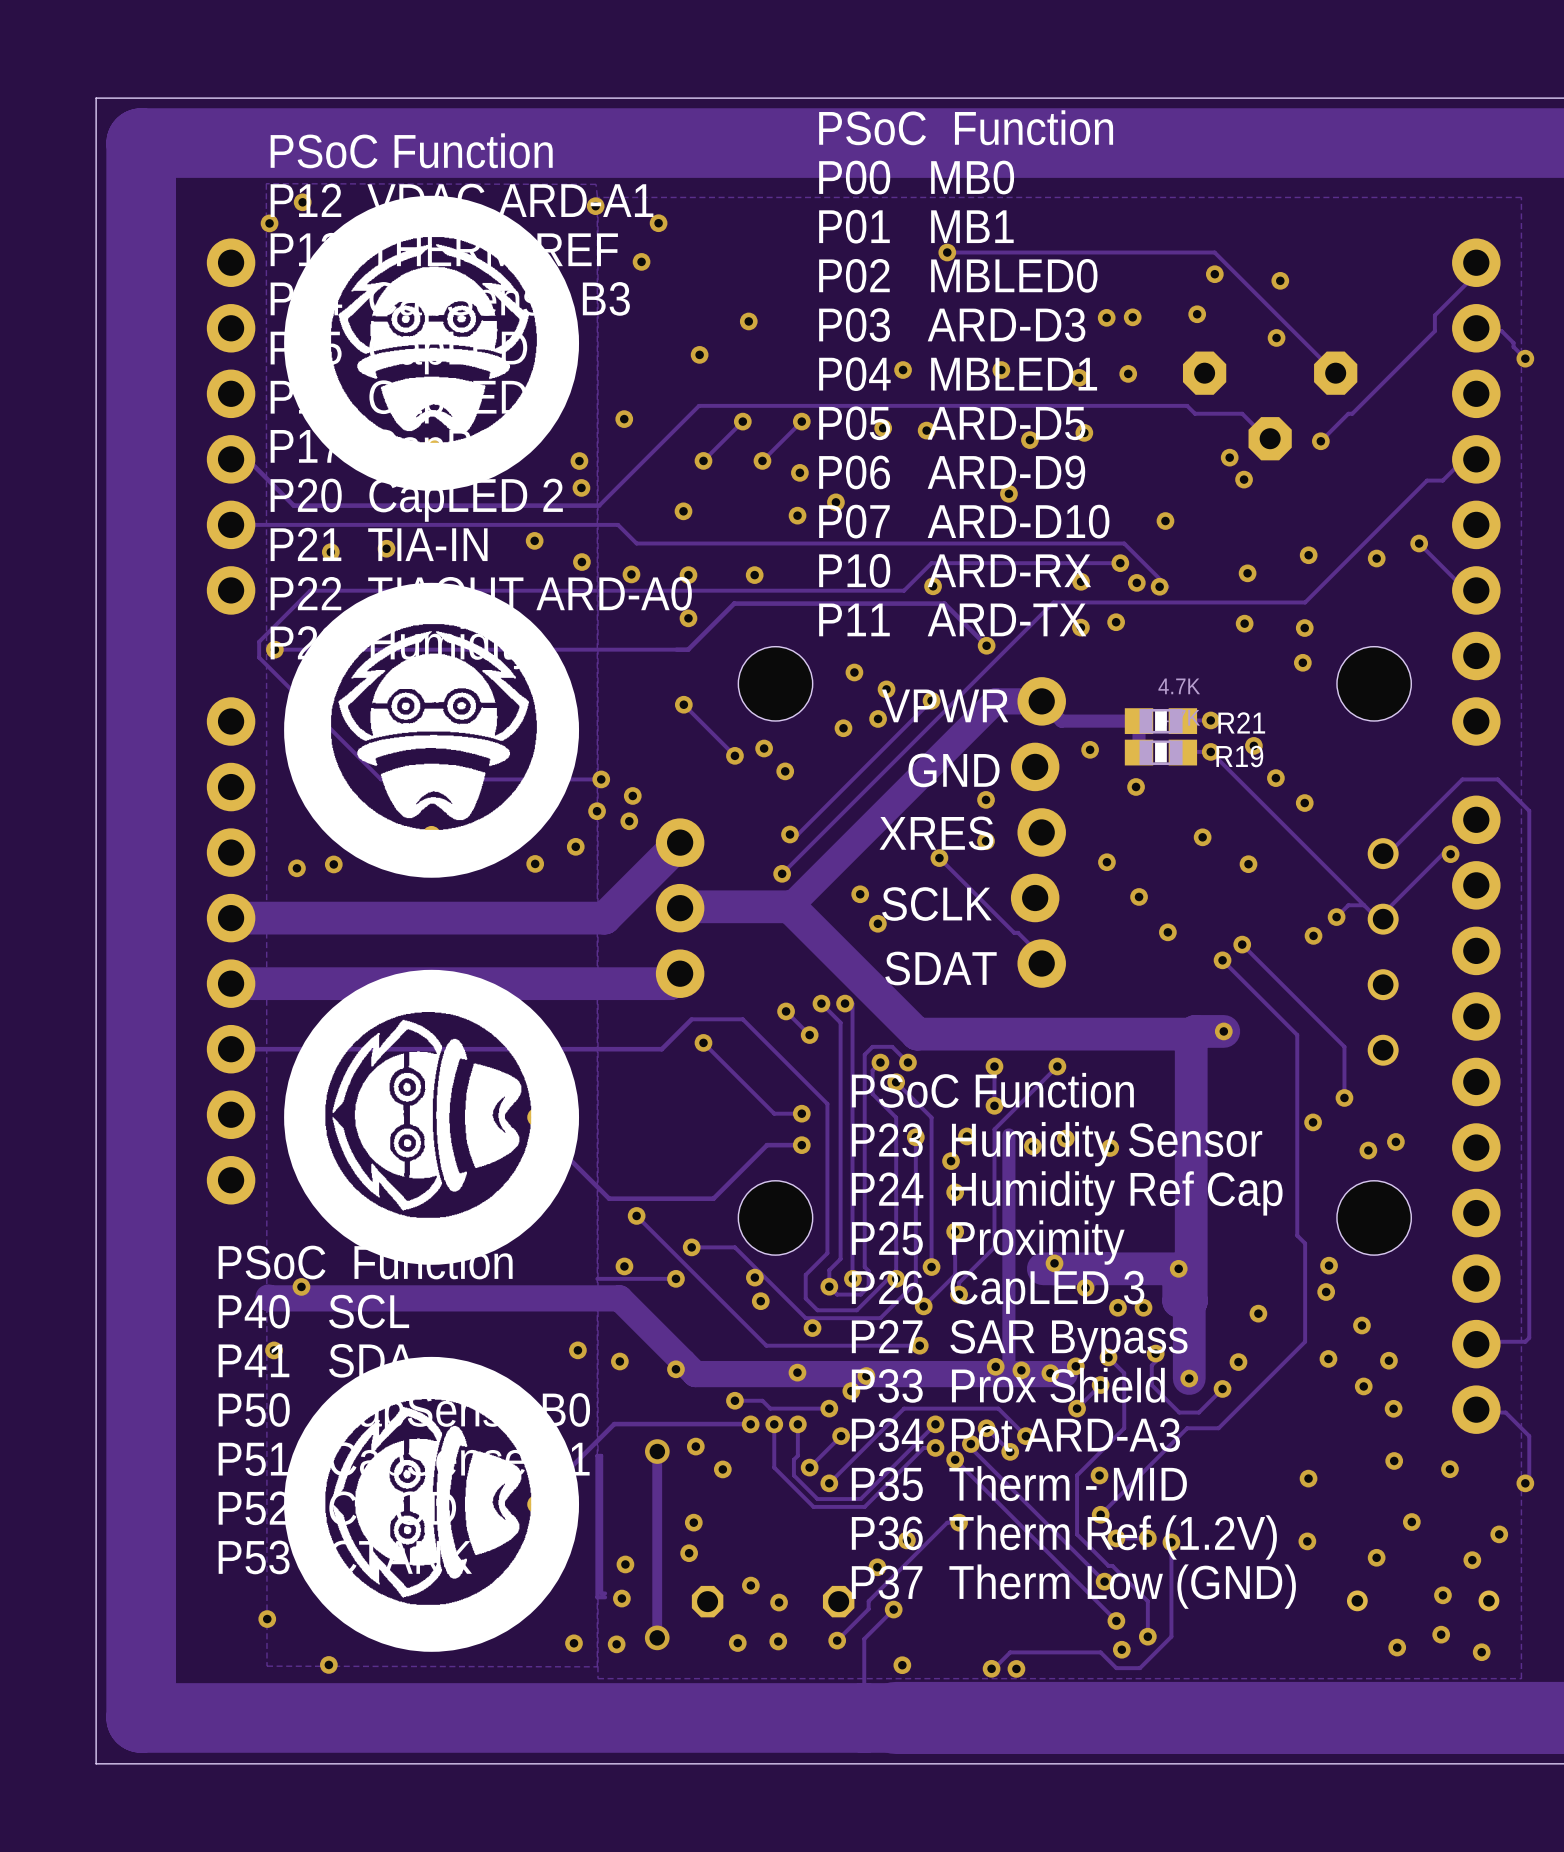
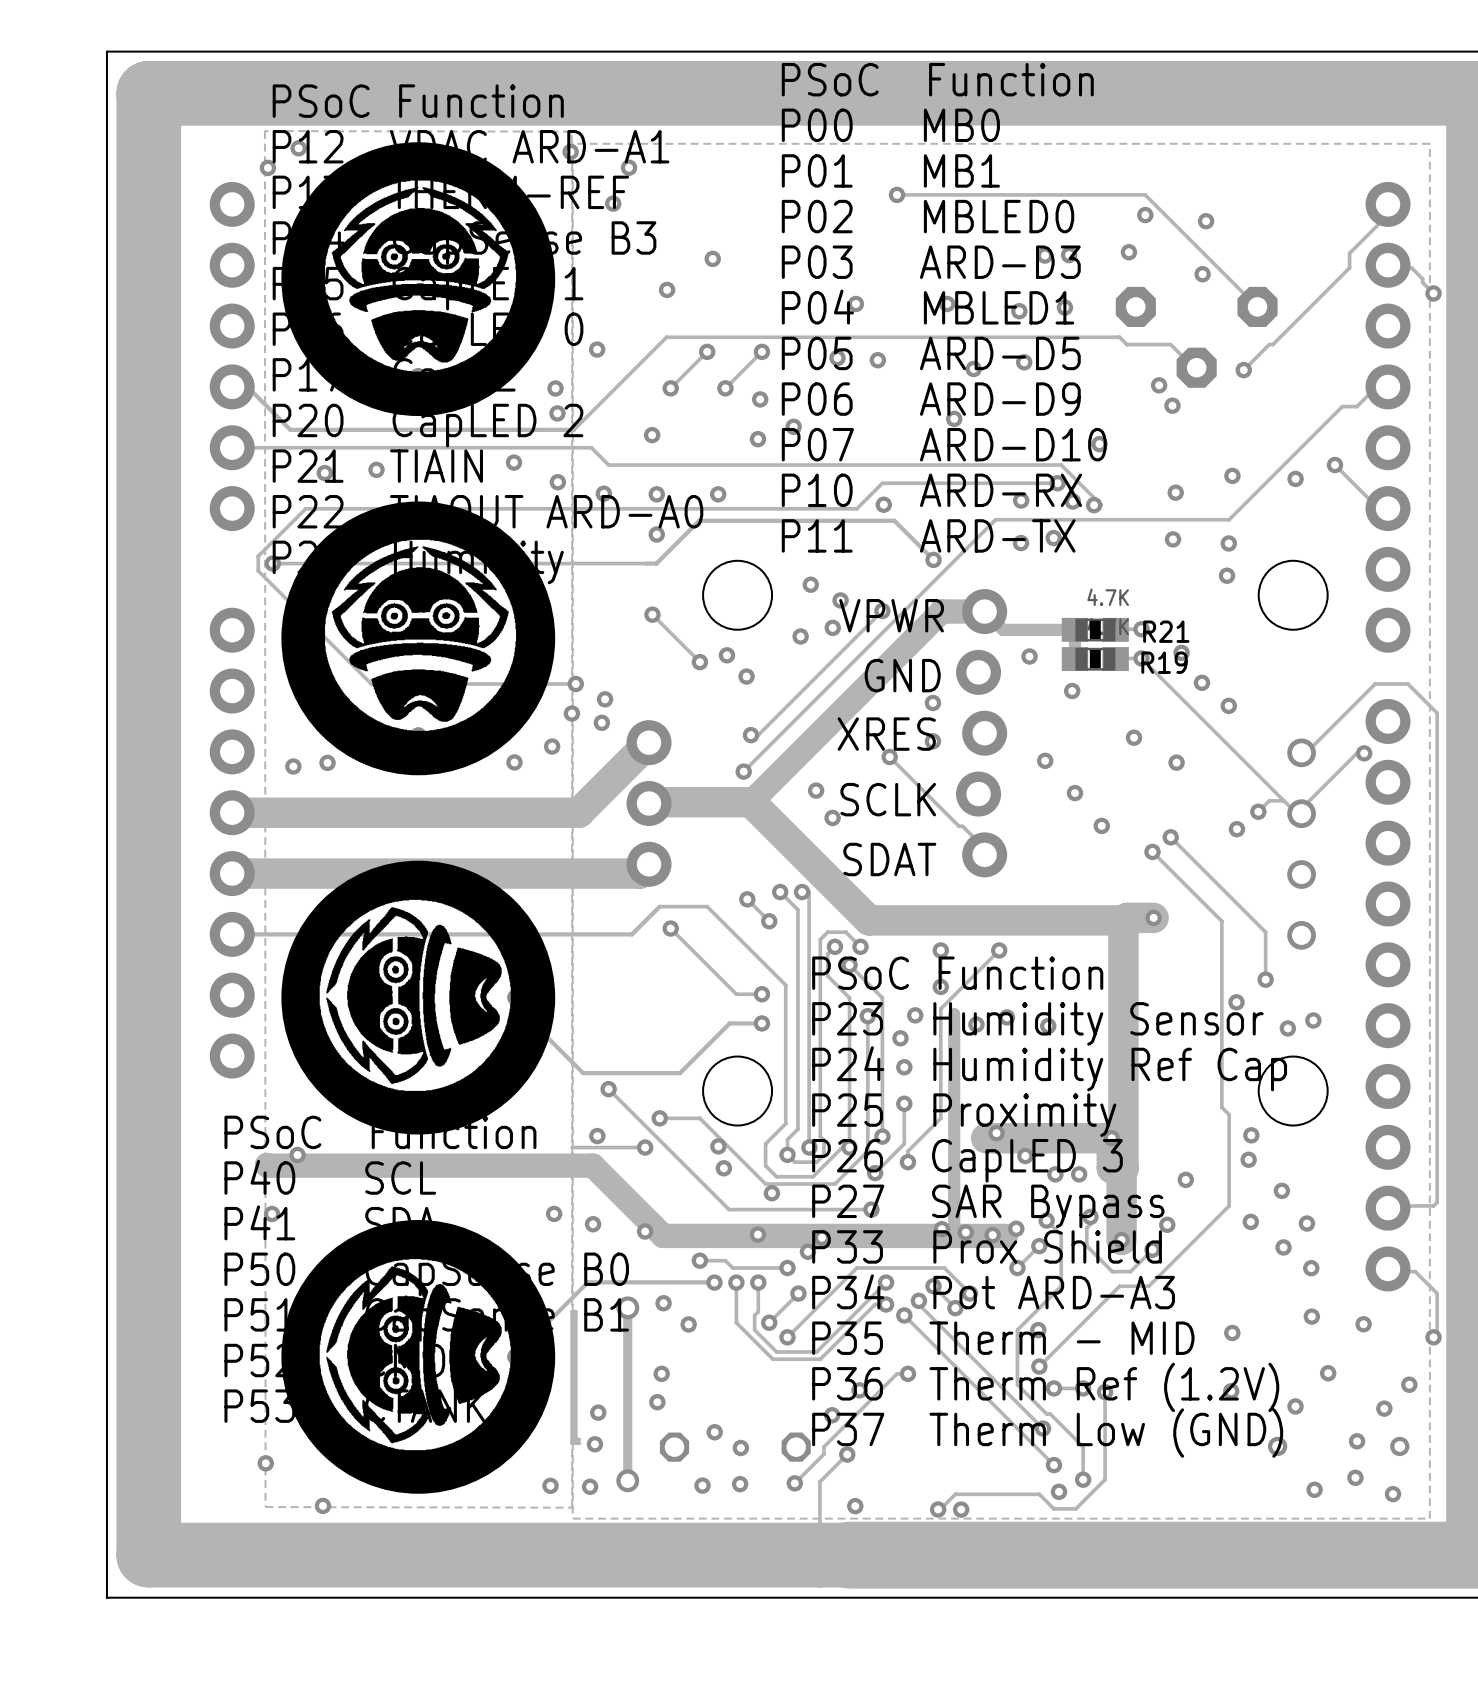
text: P21 TIA-IN (379, 544) -> P21 TIAIN (377, 466)

